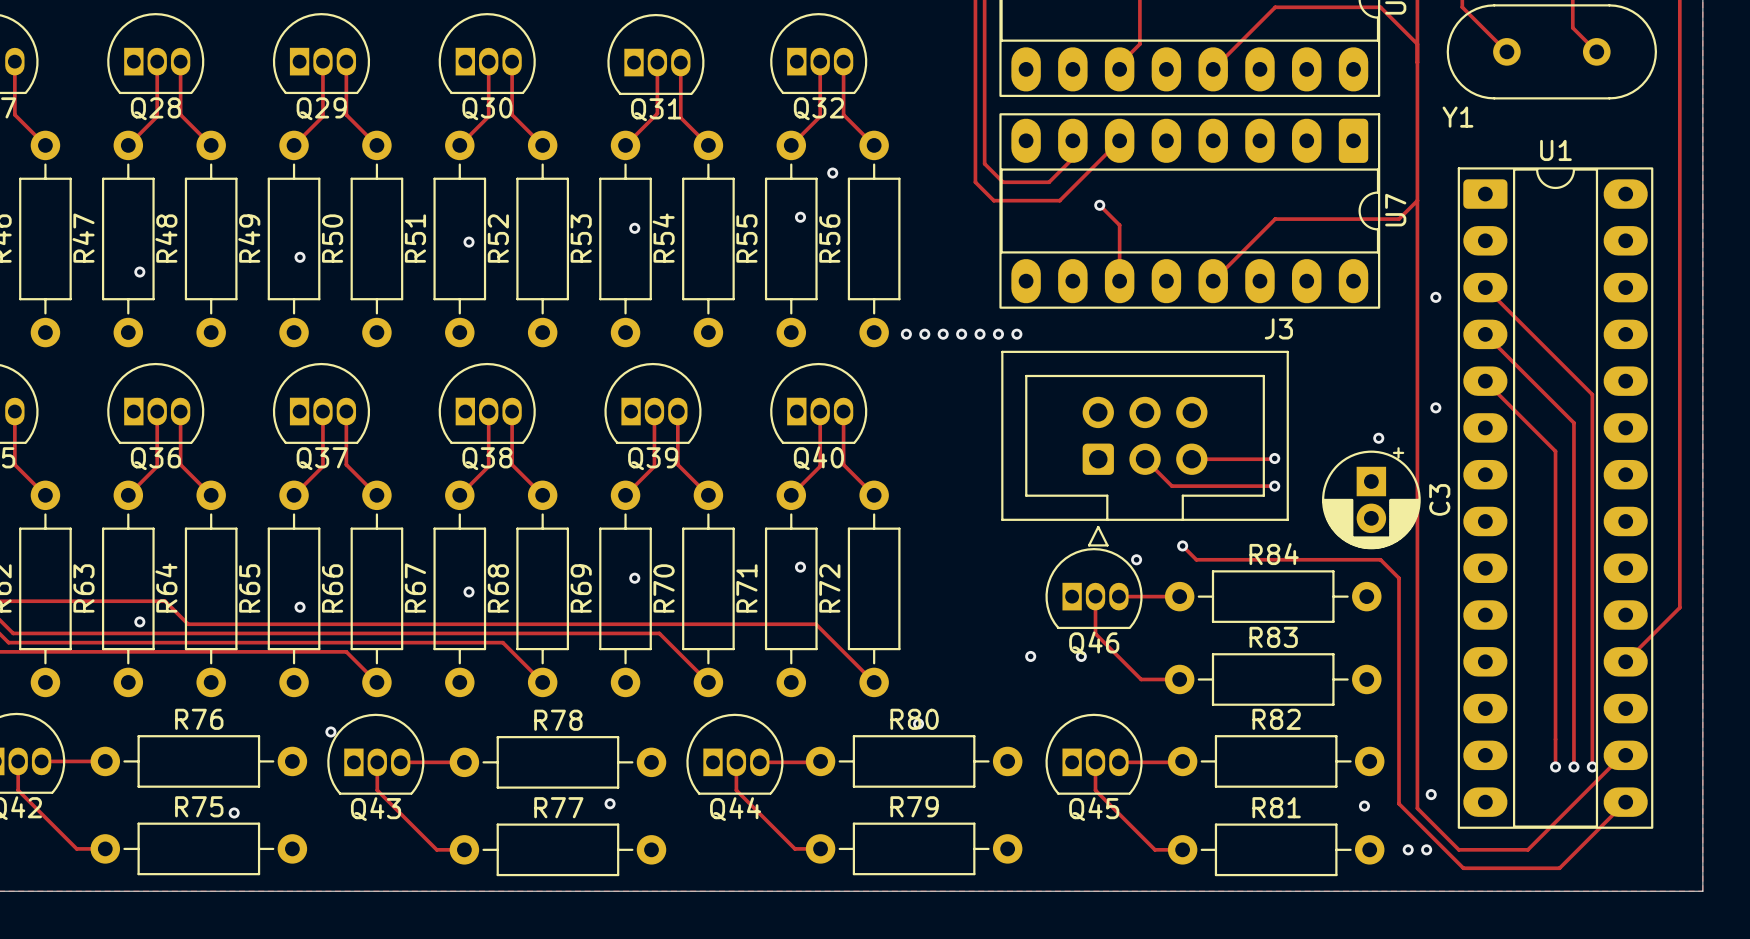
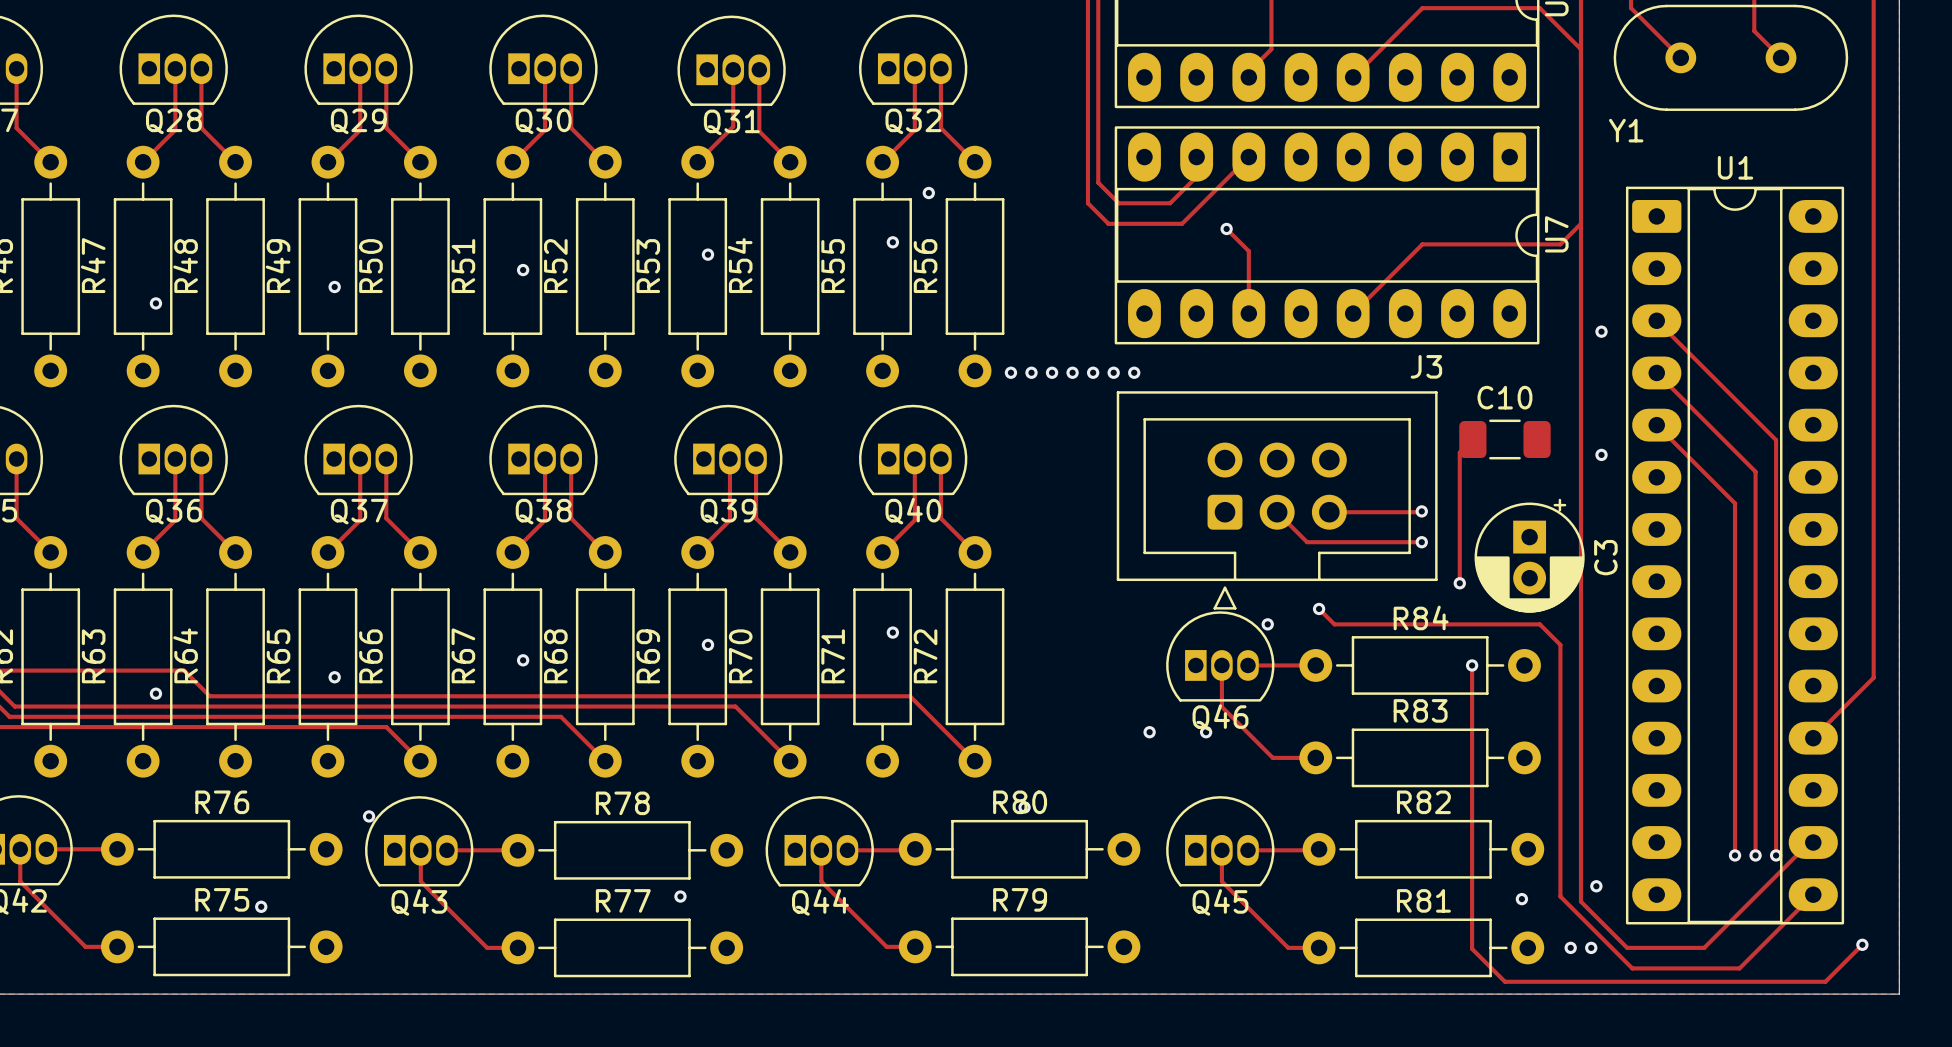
track: none -> (1472, 439) (1459, 452) (1459, 583)
C10: none -> (1504, 439)
via: (1378, 438) -> none
via: none -> (1459, 583)
track: none -> (1472, 665) (1472, 948) (1504, 981) (1825, 981) (1862, 944)
via: none -> (1472, 665)
via: none -> (1862, 944)

